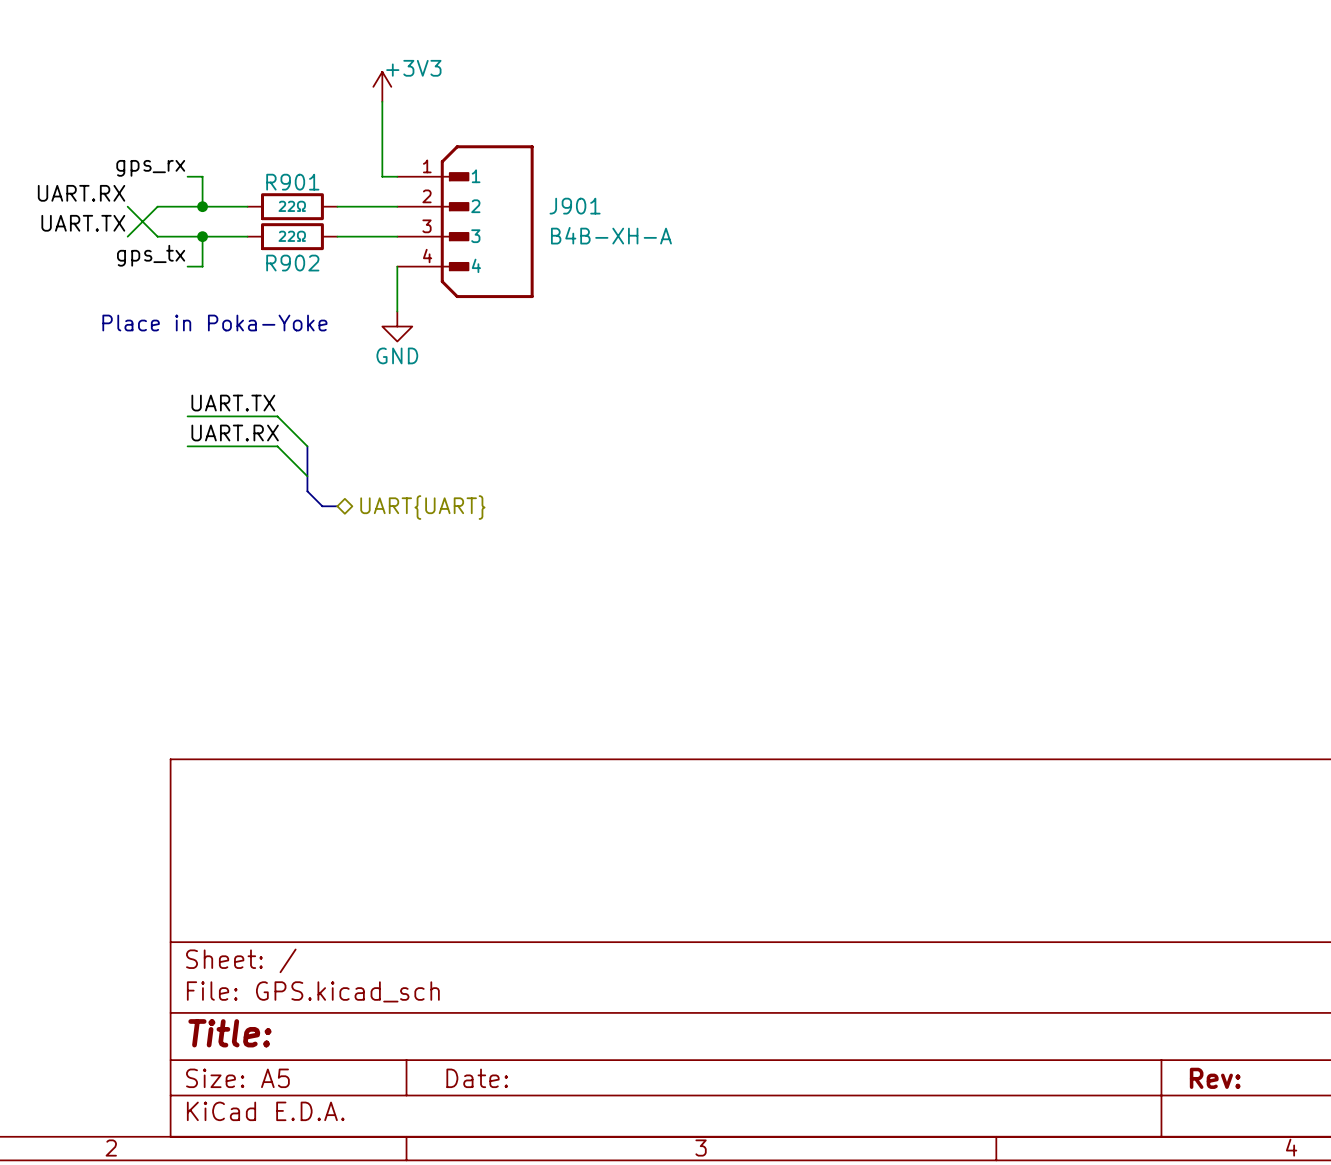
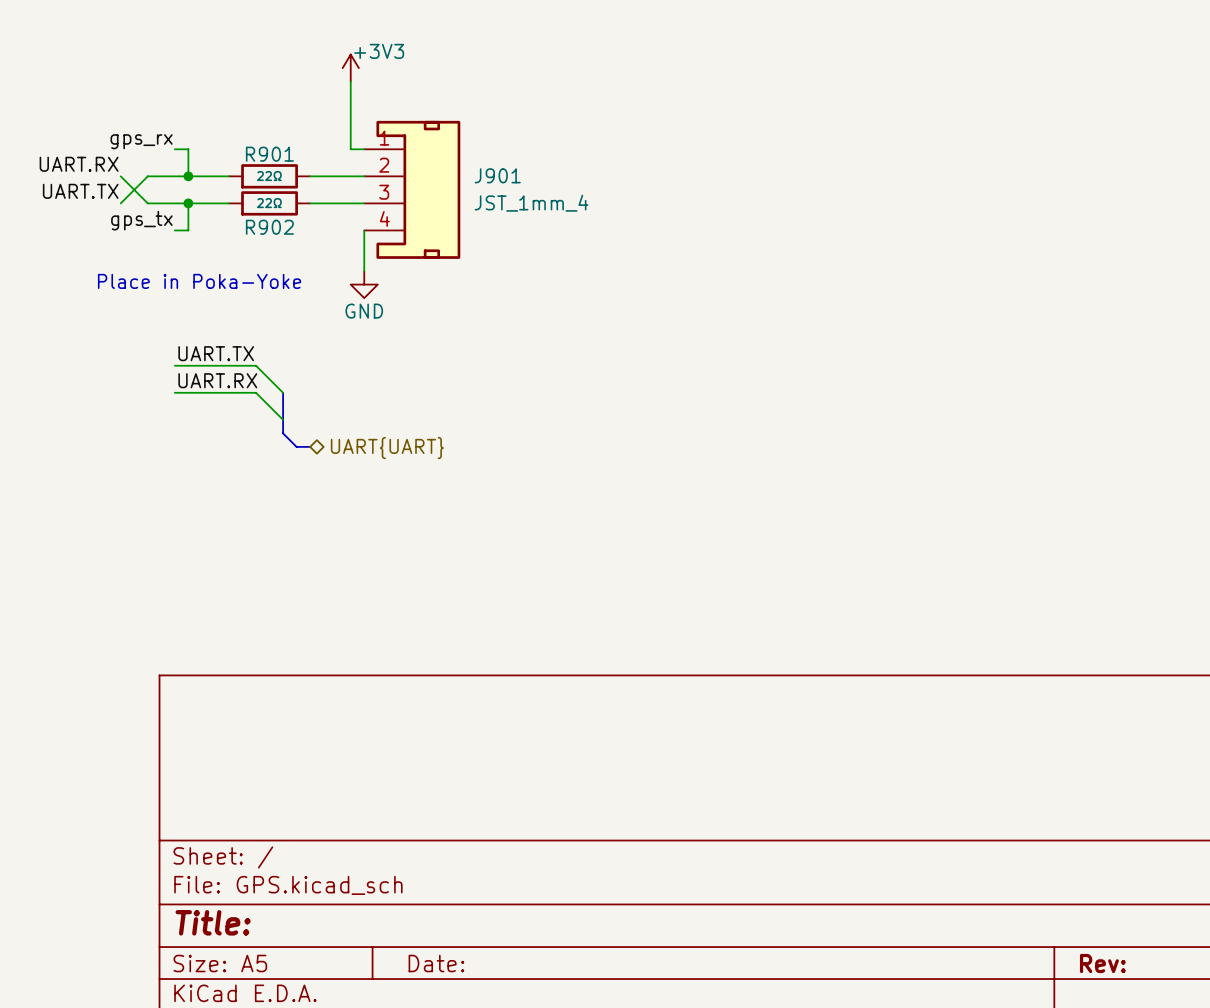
J901 symbol: [397, 145, 534, 299] -> [364, 120, 461, 259]
J901 value: B4B-XH-A (611, 235) -> JST_1mm_4 (531, 203)

